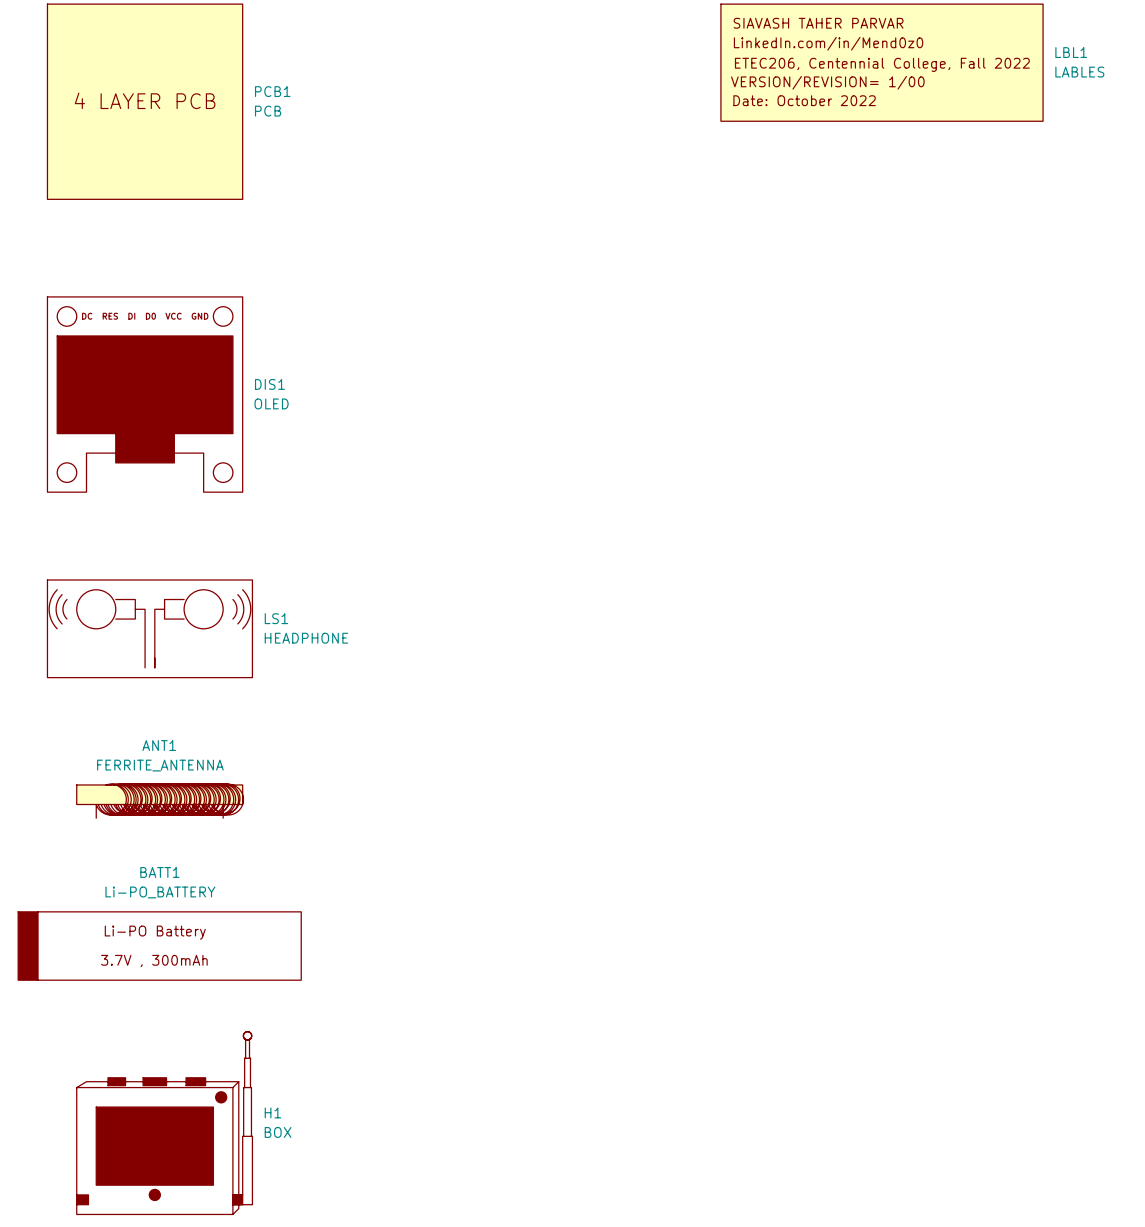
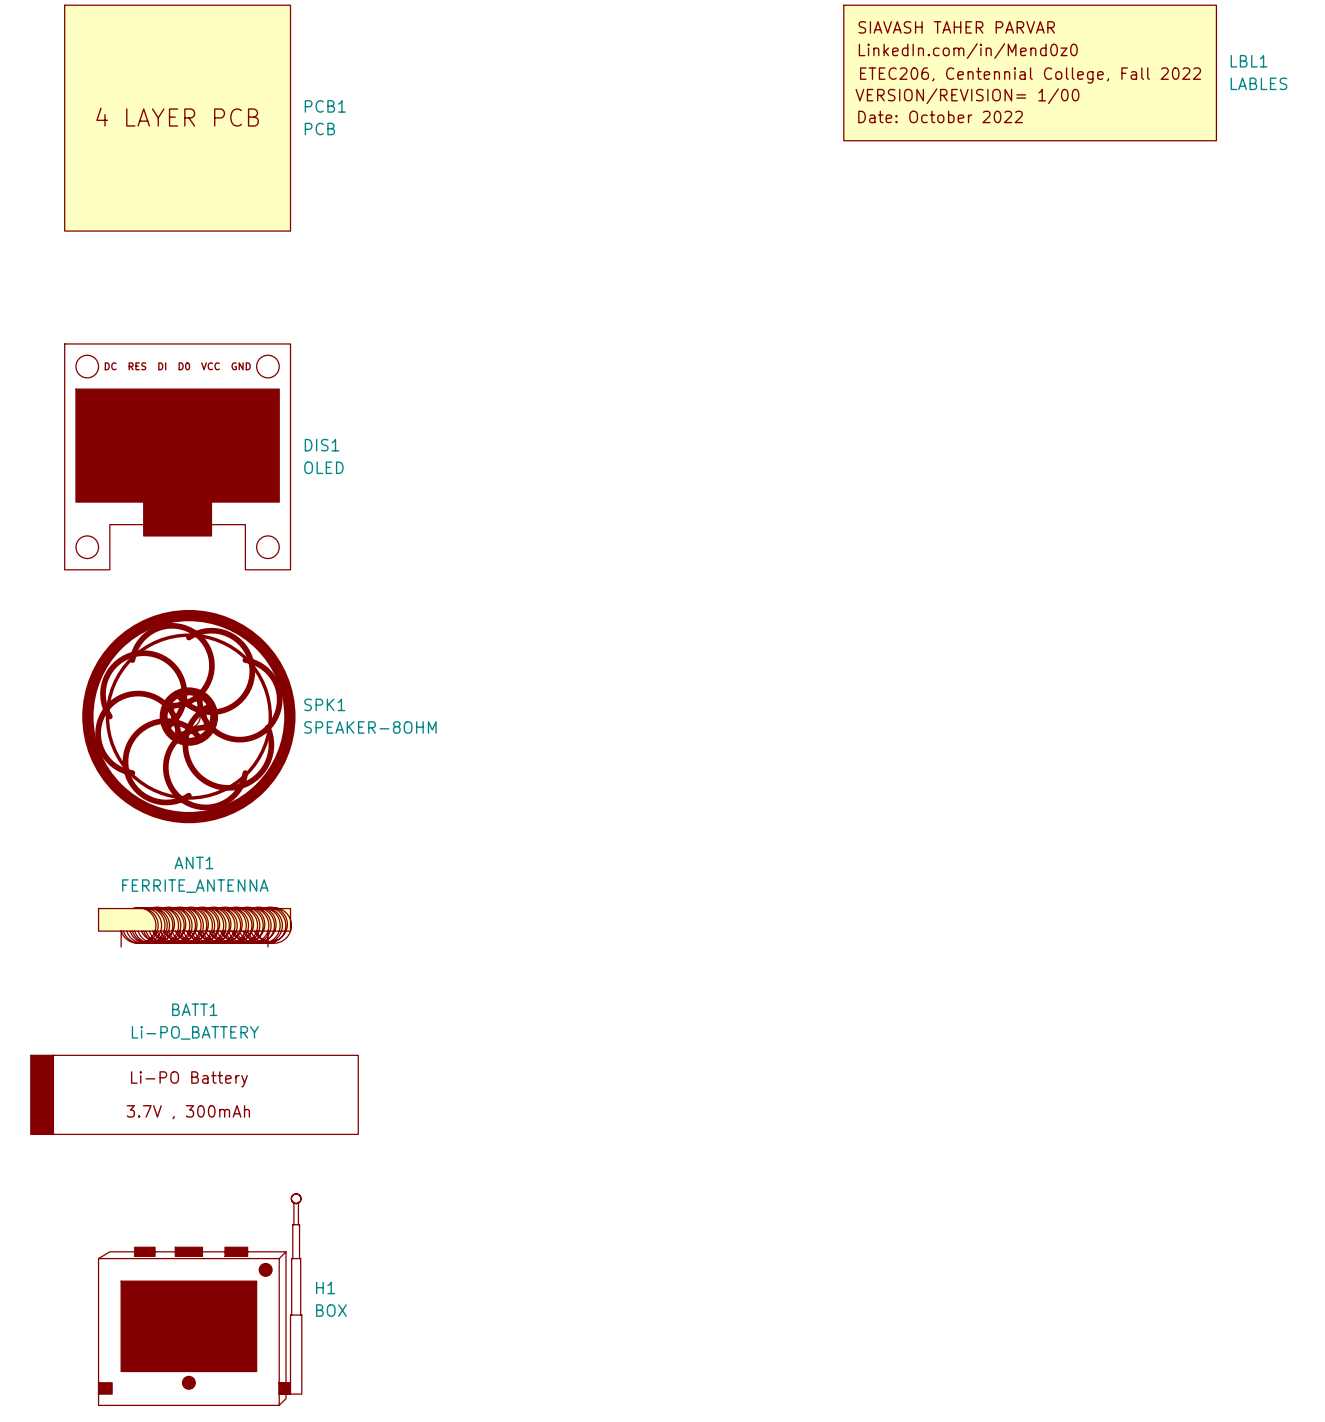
SPK1: none -> SPEAKER-8OHM (188, 716)
LS1: HEADPHONE (149, 628) -> none

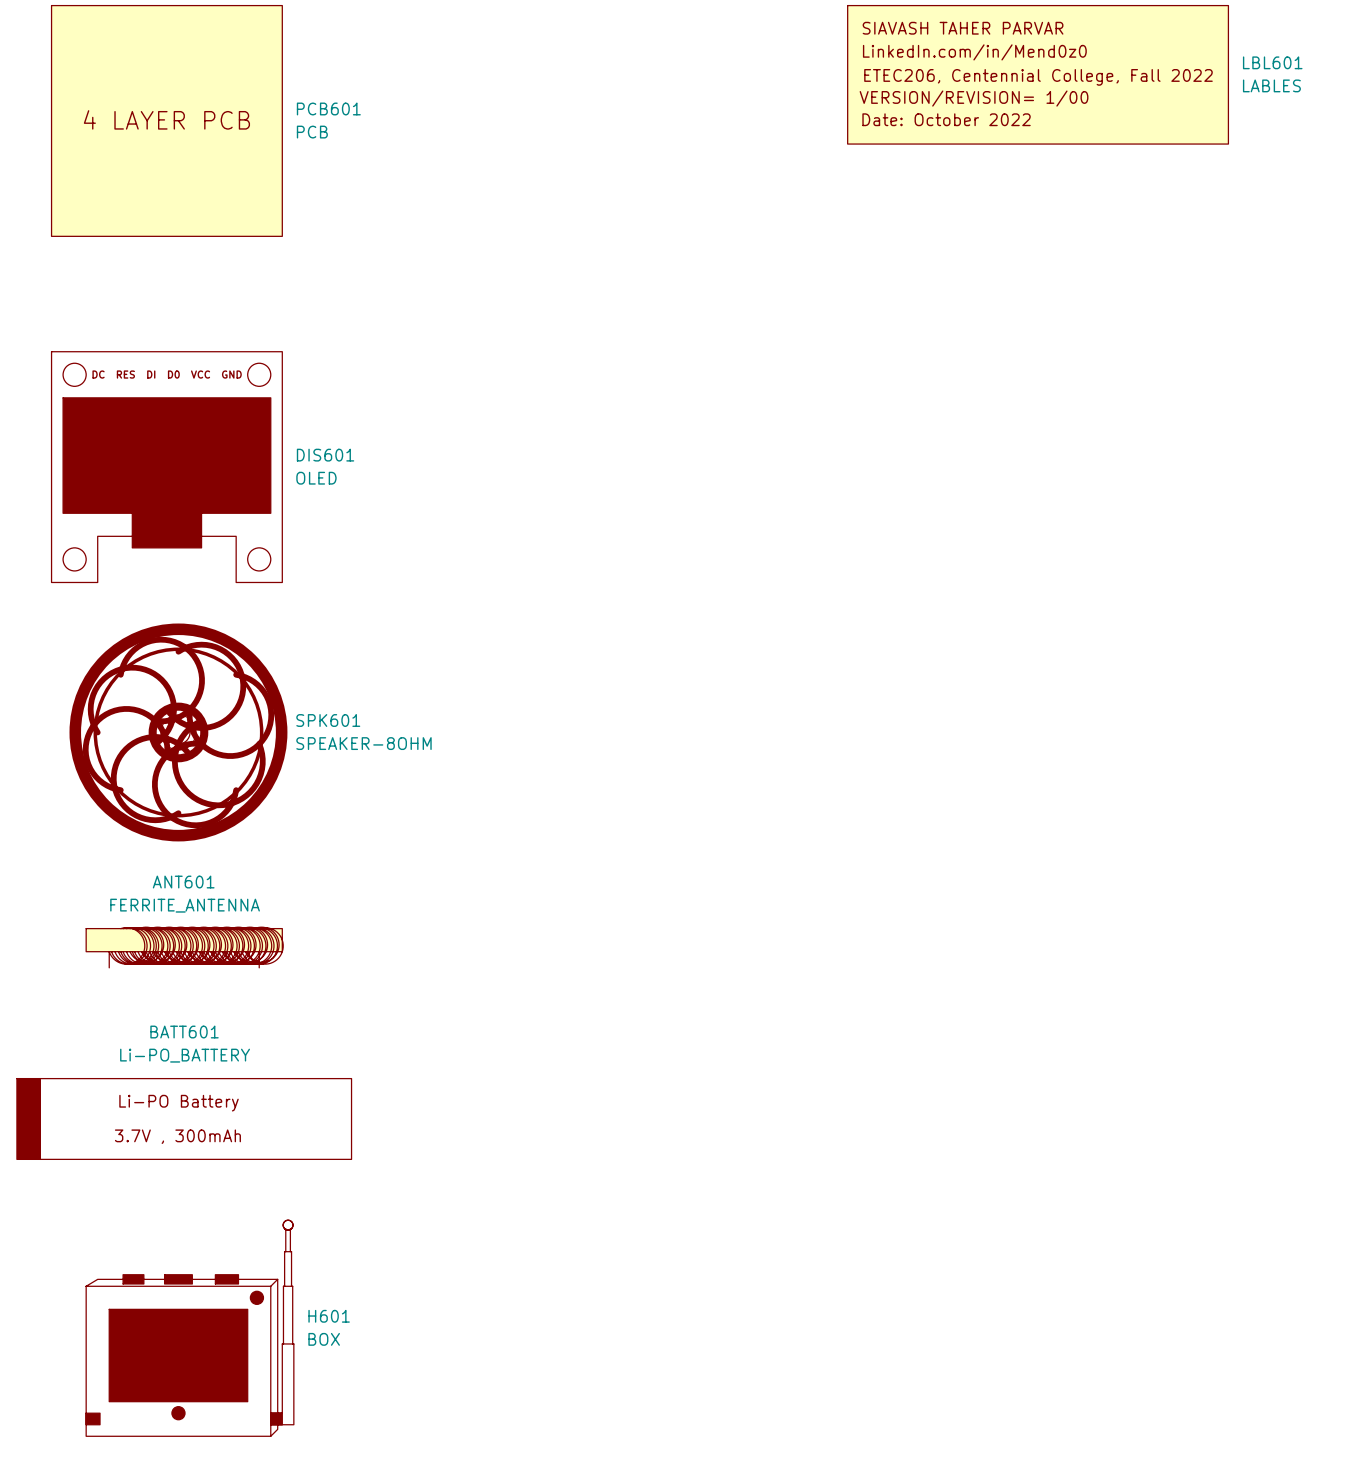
LBL1 name: LBL1 (1249, 61) -> LBL601 (1272, 62)
PCB1 name: PCB1 (325, 106) -> PCB601 (328, 108)
DIS1 name: DIS1 (322, 445) -> DIS601 (325, 455)
SPK1 name: SPK1 (324, 704) -> SPK601 (328, 720)
ANT1 name: ANT1 (194, 862) -> ANT601 (183, 882)
BATT1 name: BATT1 (194, 1009) -> BATT601 (184, 1032)
H1 name: H1 (325, 1287) -> H601 (329, 1316)

